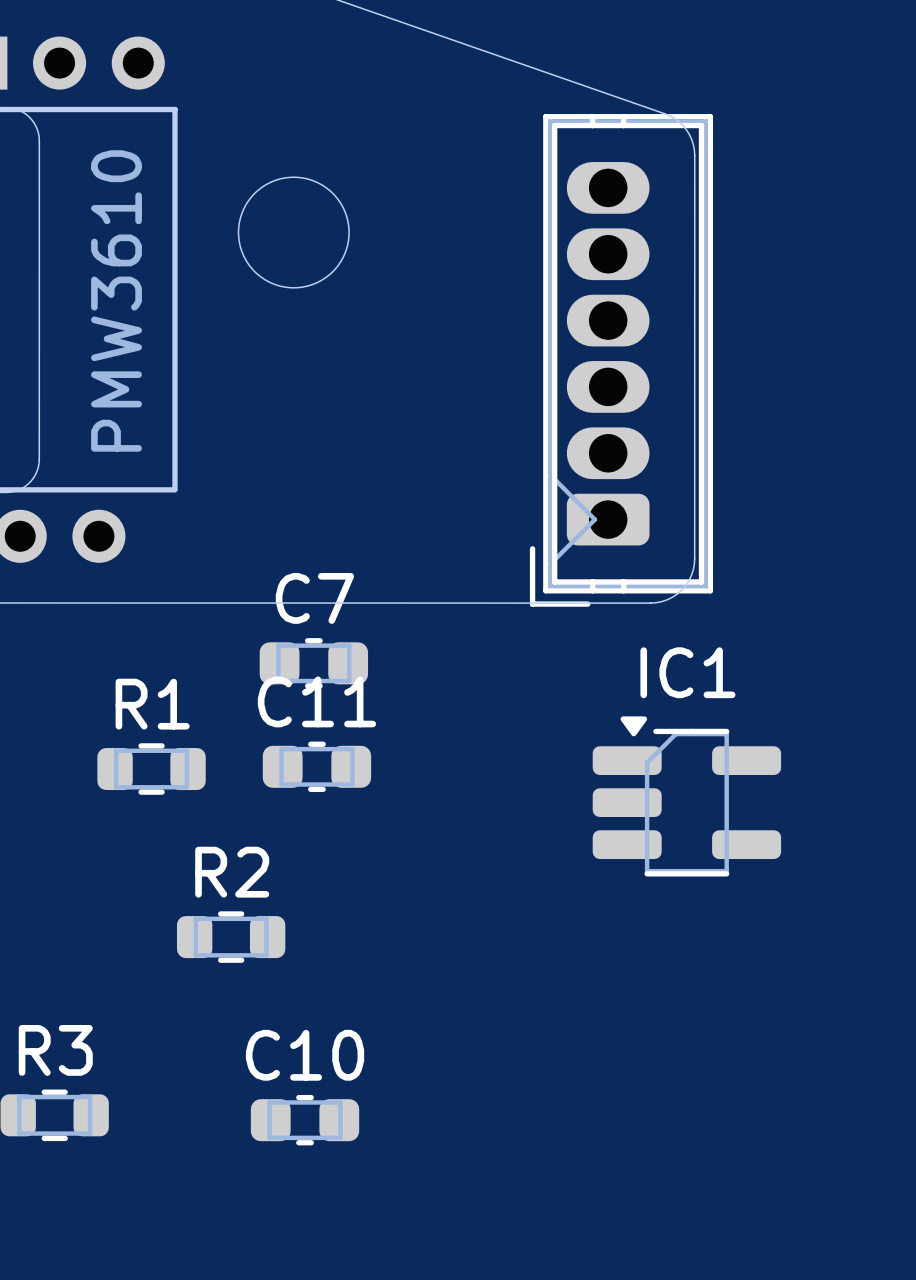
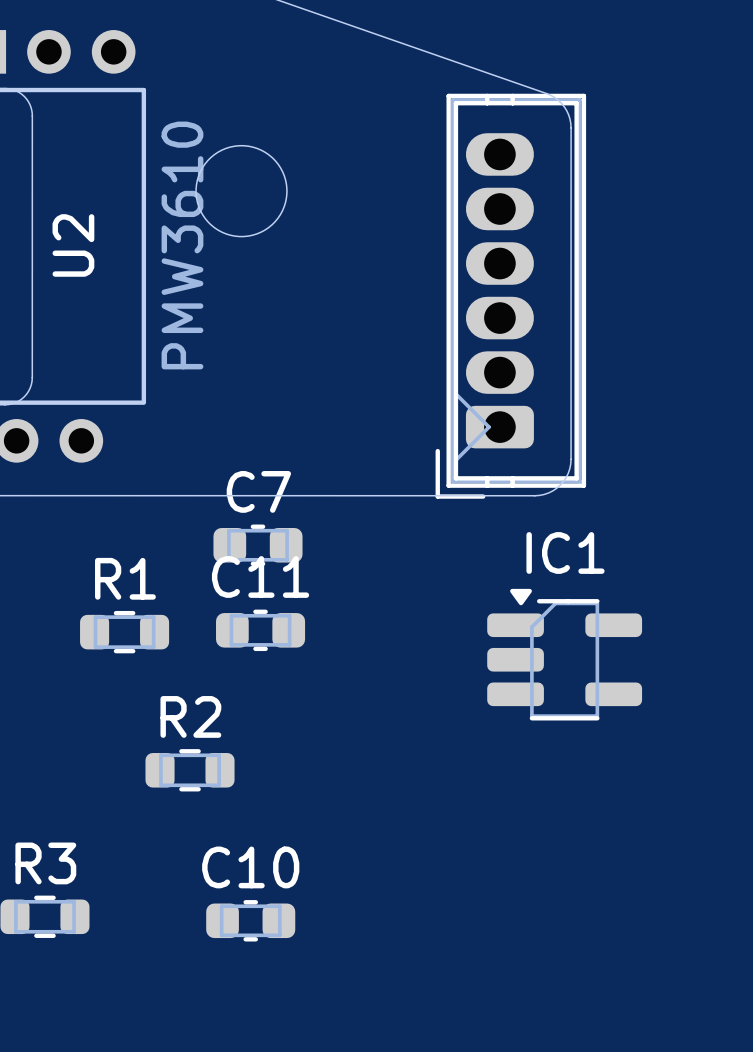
U2 name: none -> U2 (73, 245)
U2 value position: PMW3610 (116, 300) -> PMW3610 (182, 245)

